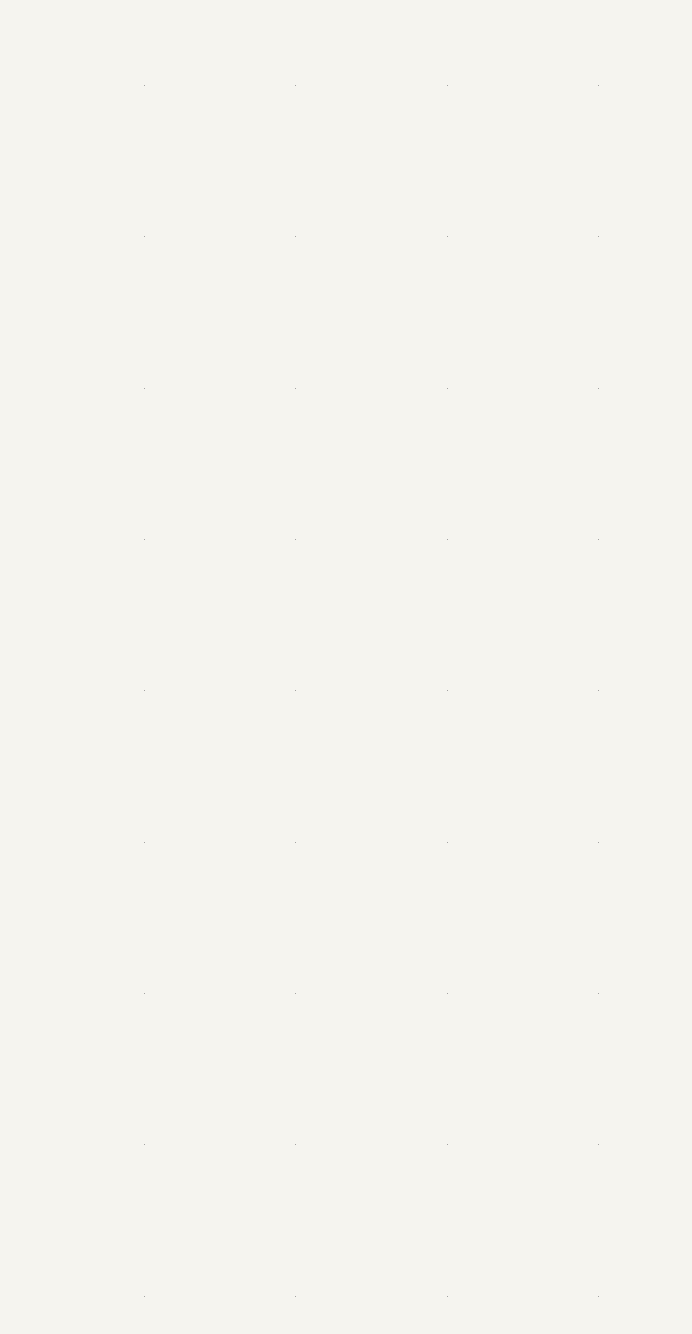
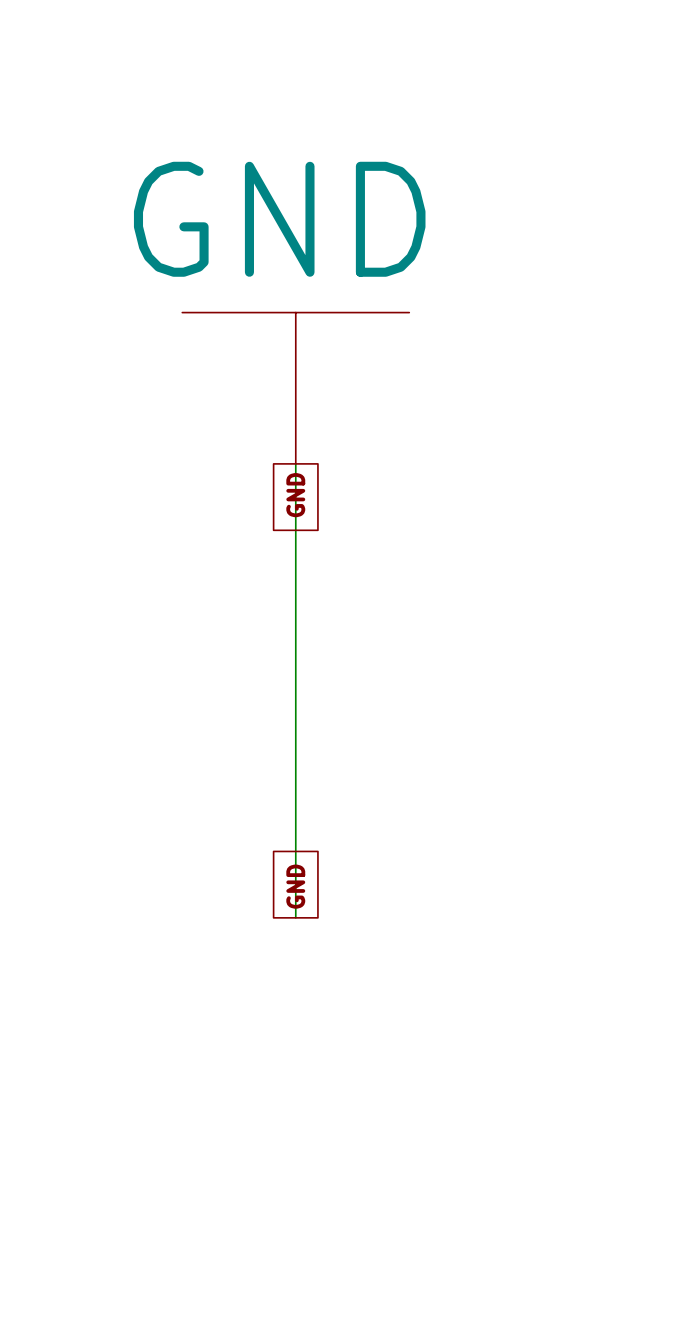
power symbol: none -> GND (295, 388)
wire: none -> (295, 463) (295, 917)
global label: none -> GND (295, 495)
global label: none -> GND (295, 886)

